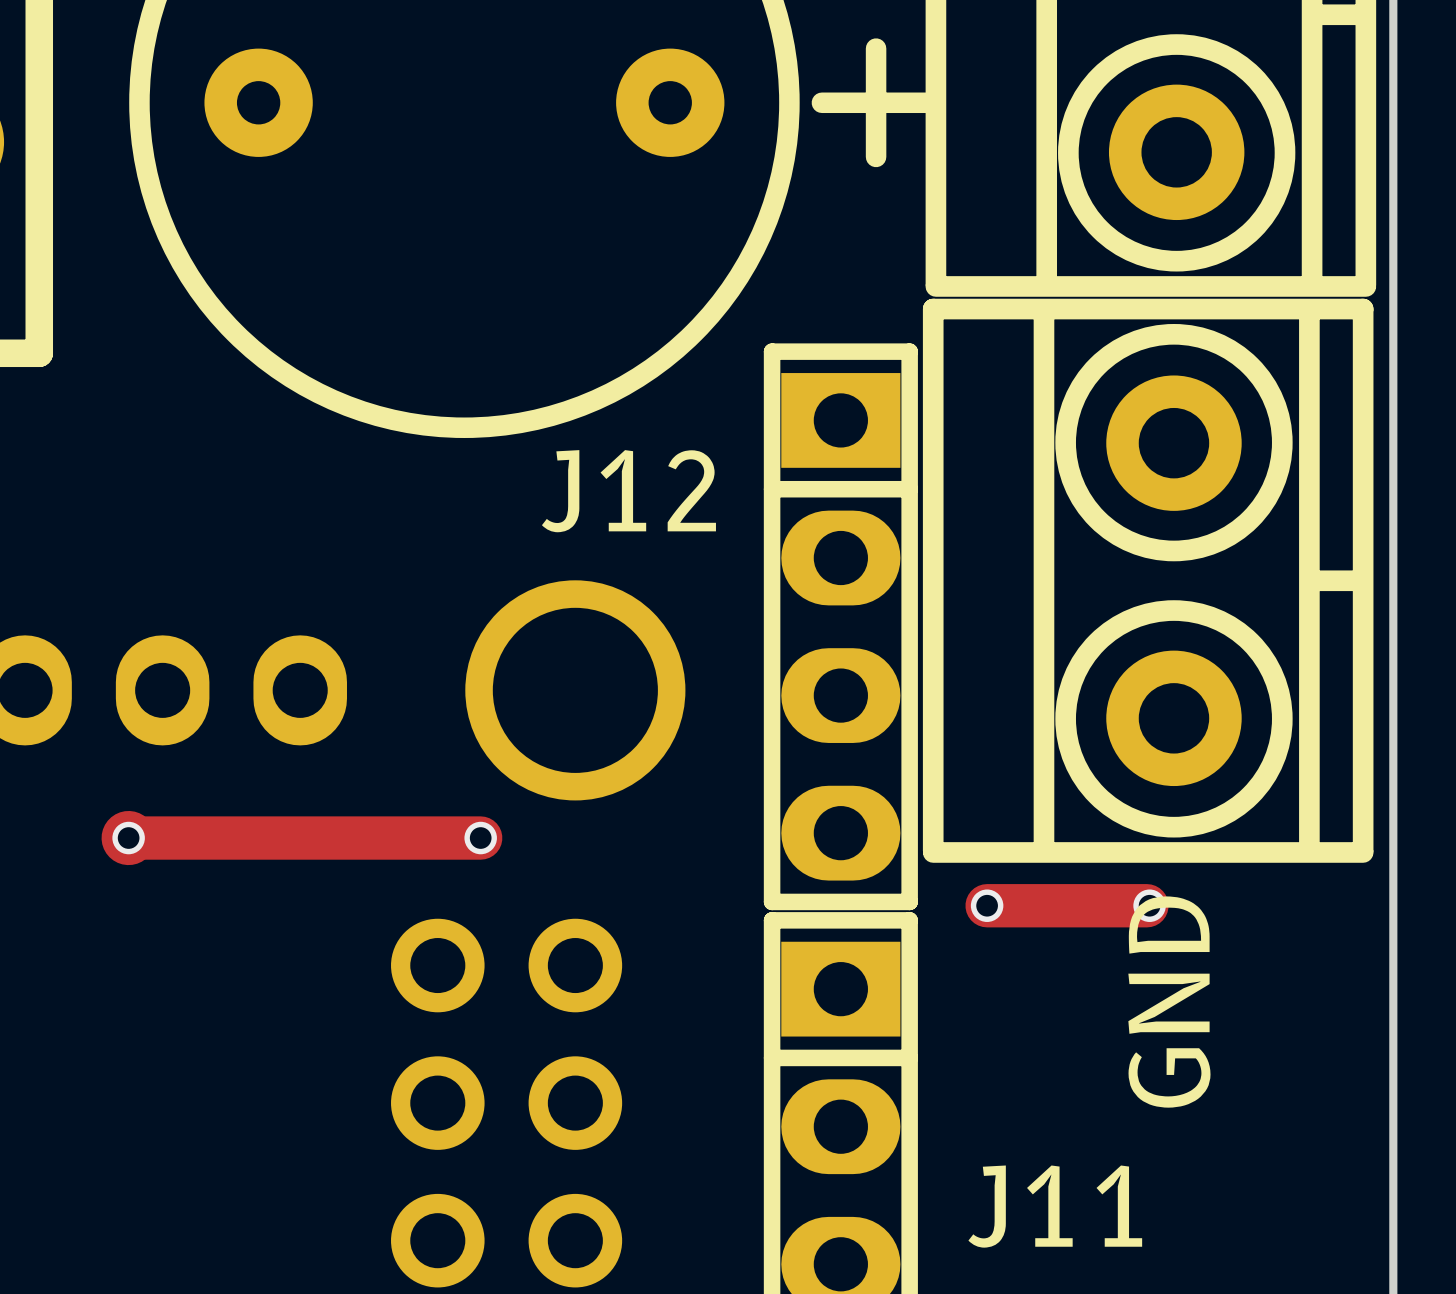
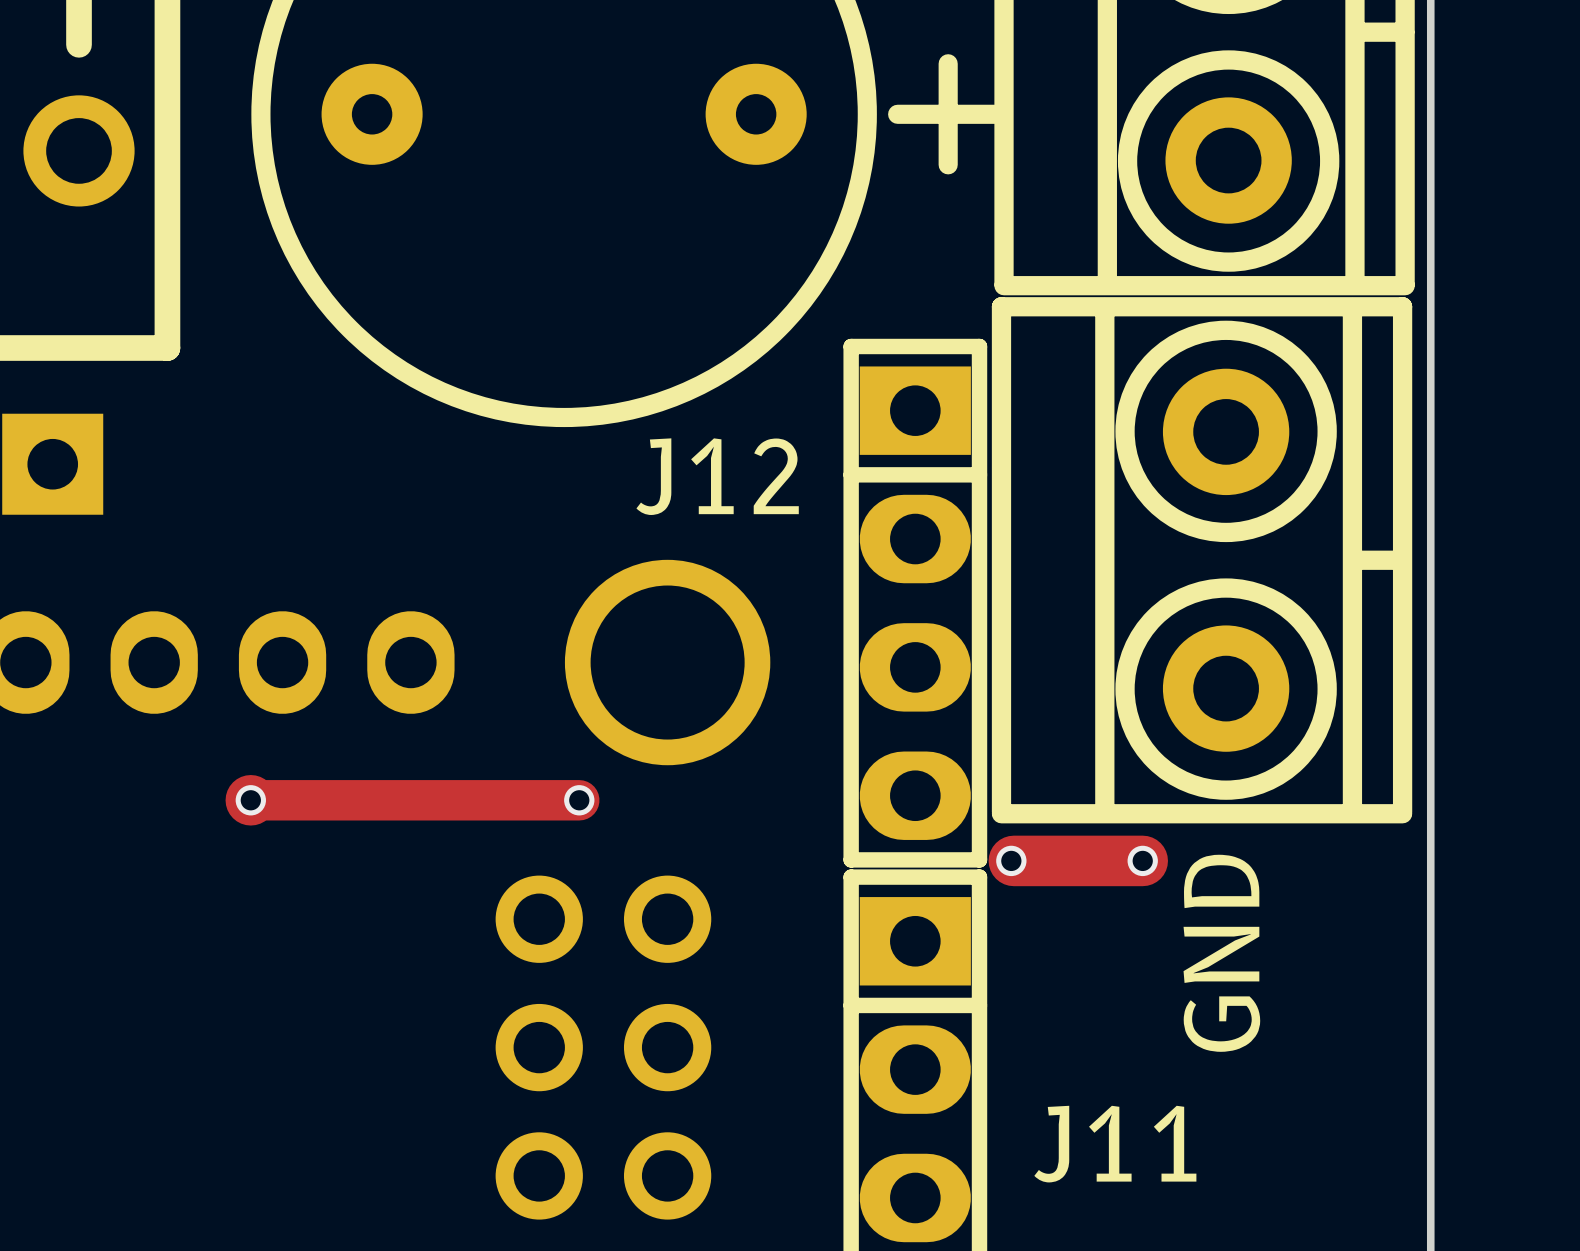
track: none -> (1013, 860) (1142, 860)
via: none -> (1142, 860)
track: (987, 905) (1146, 905) -> none
via position: (987, 905) -> (1011, 860)
via: (1149, 905) -> none

